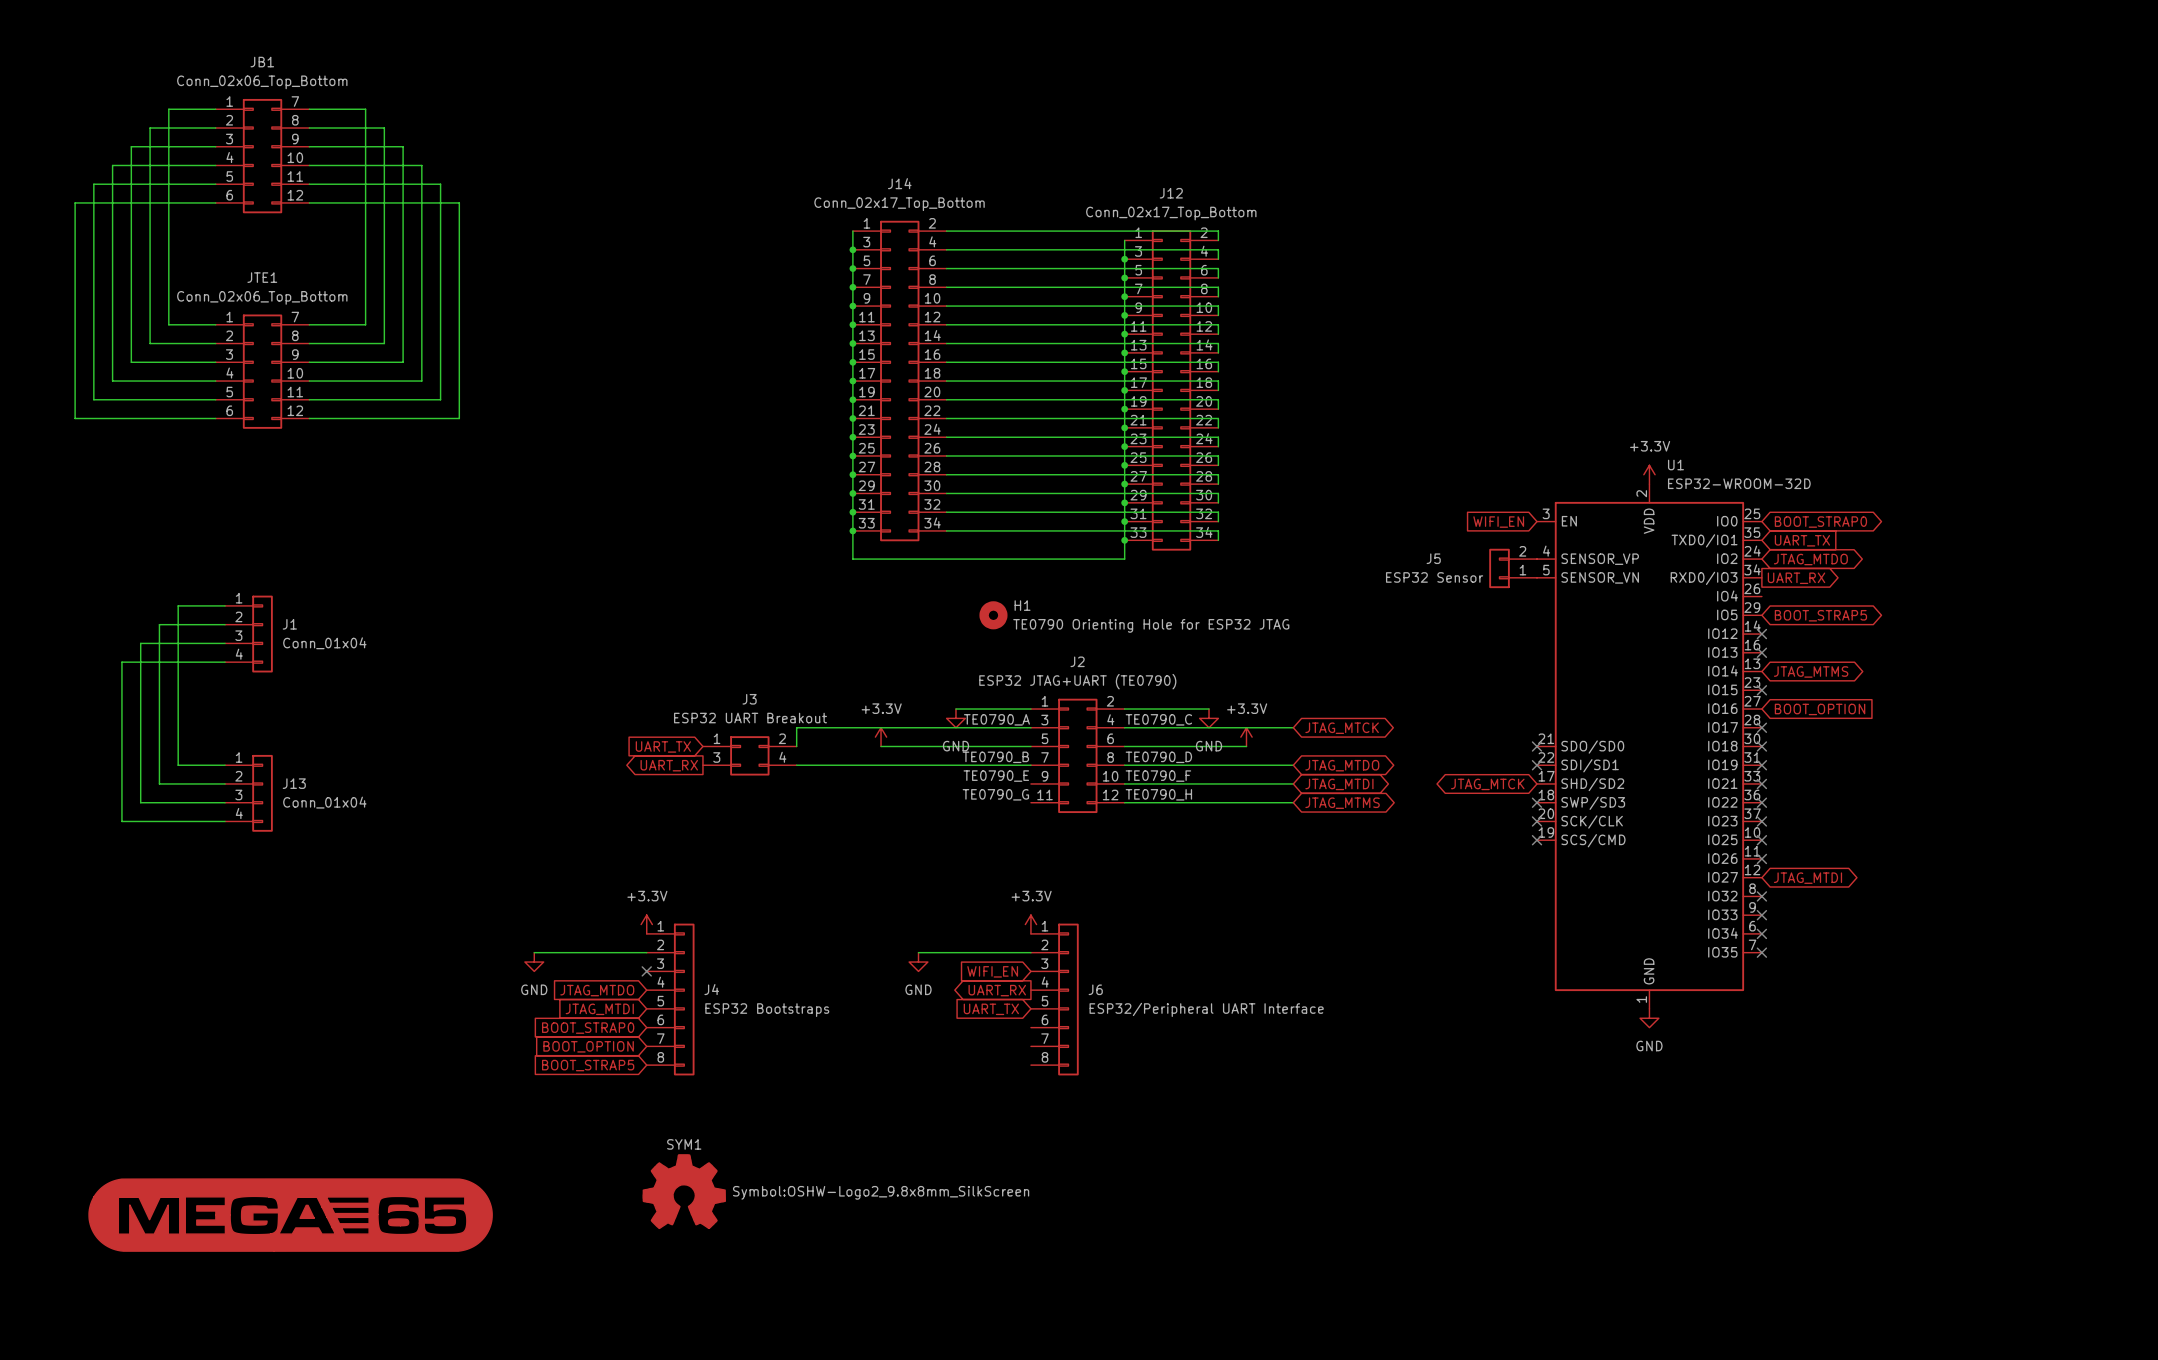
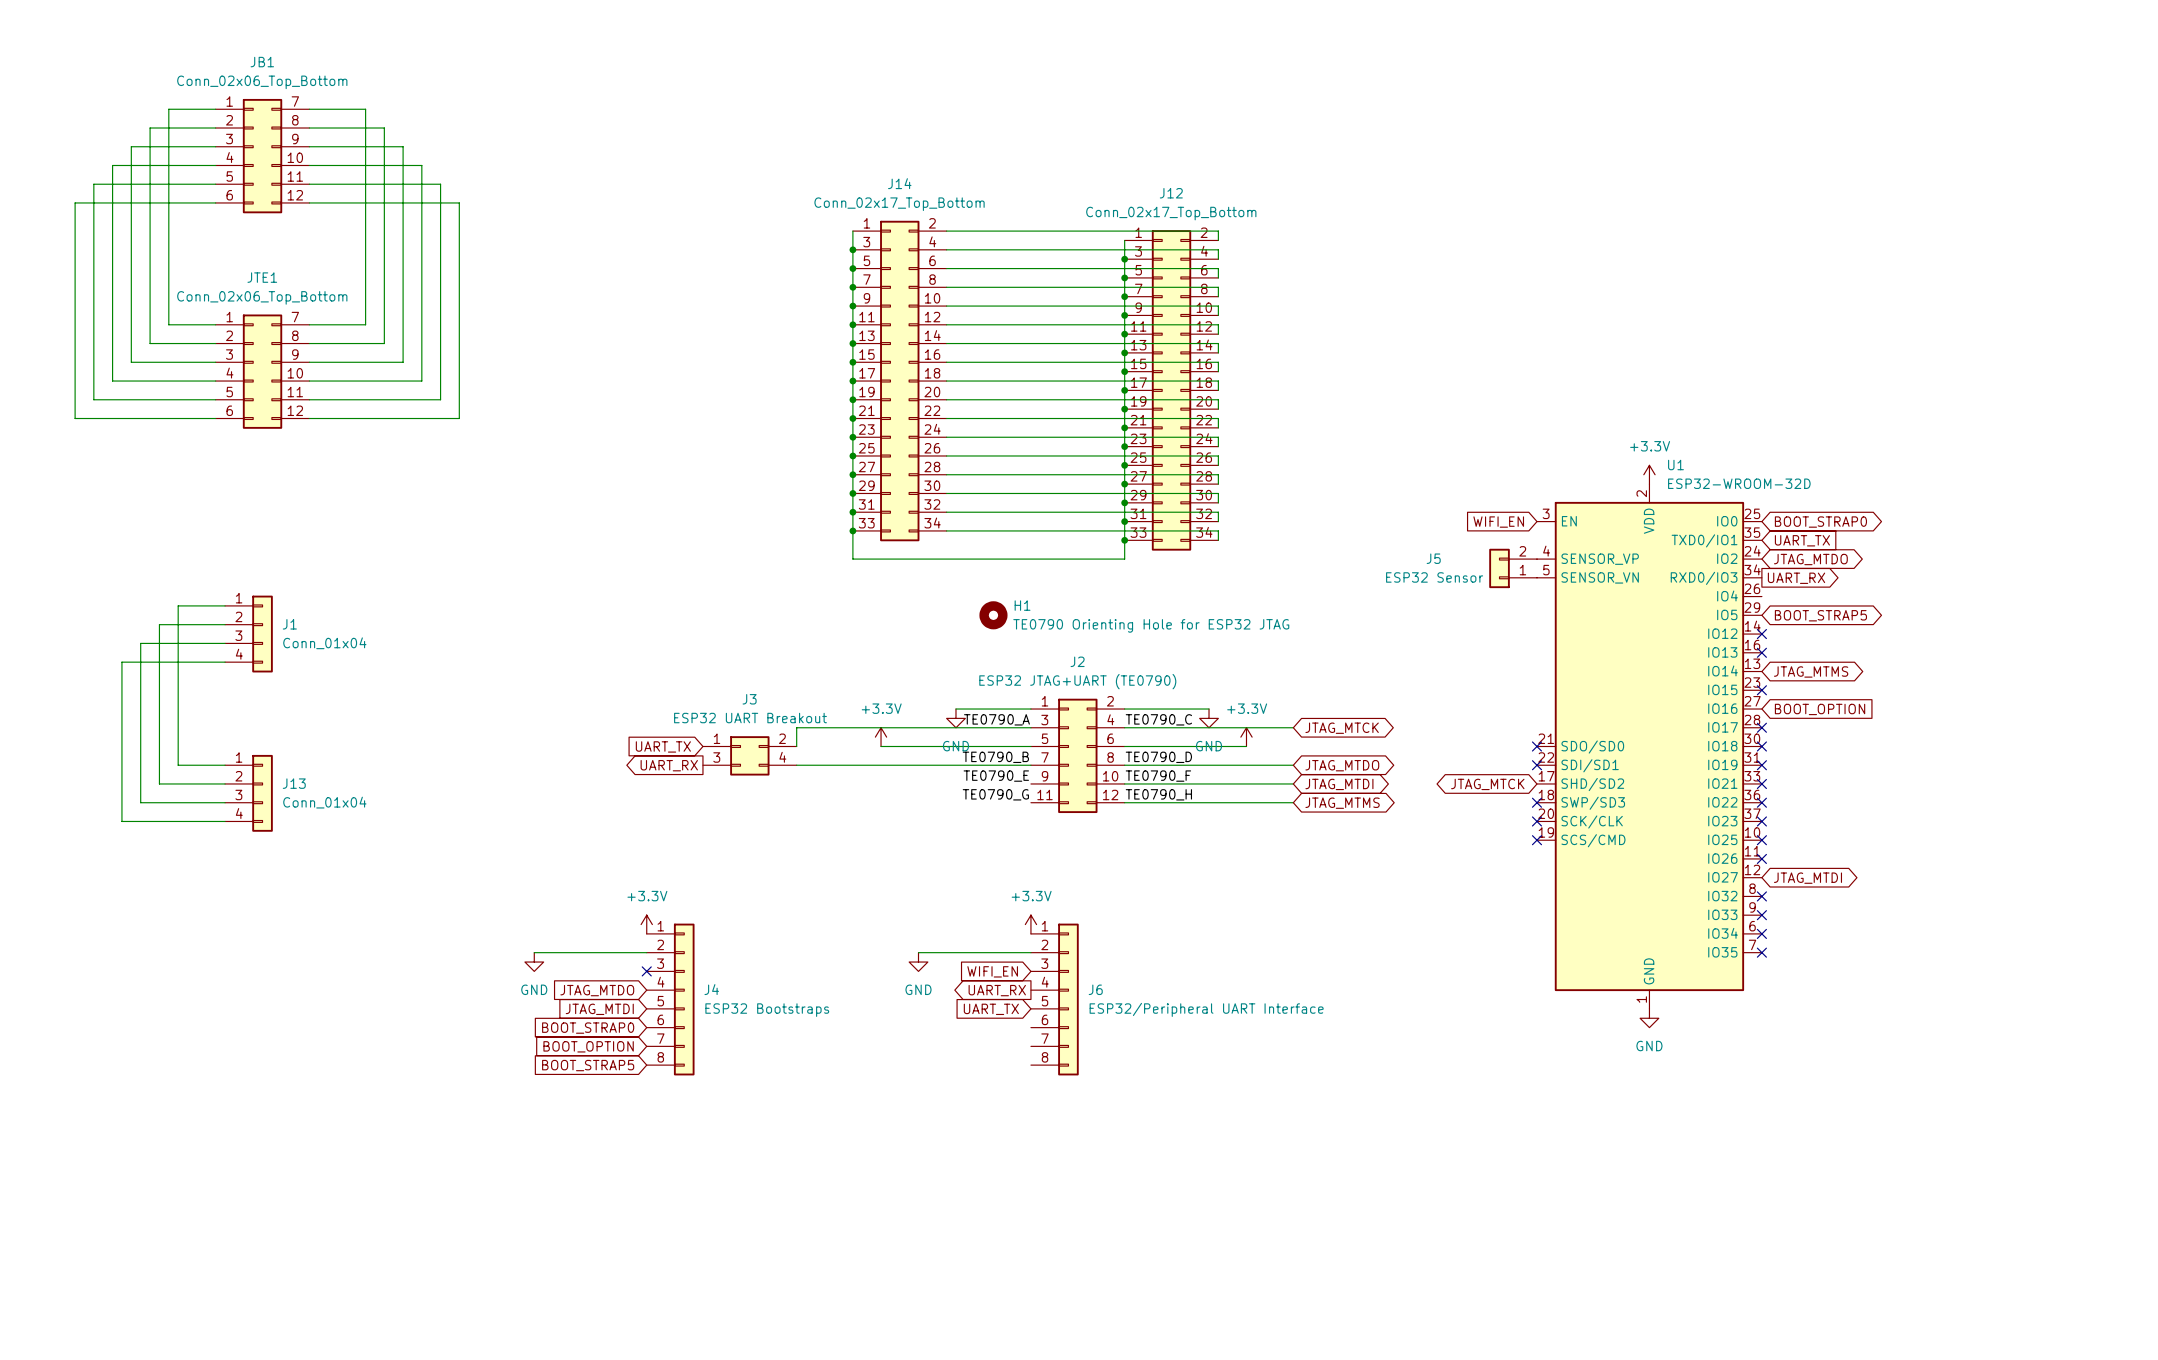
SYM1: (684, 1191) -> none
part: (290, 1215) -> none

